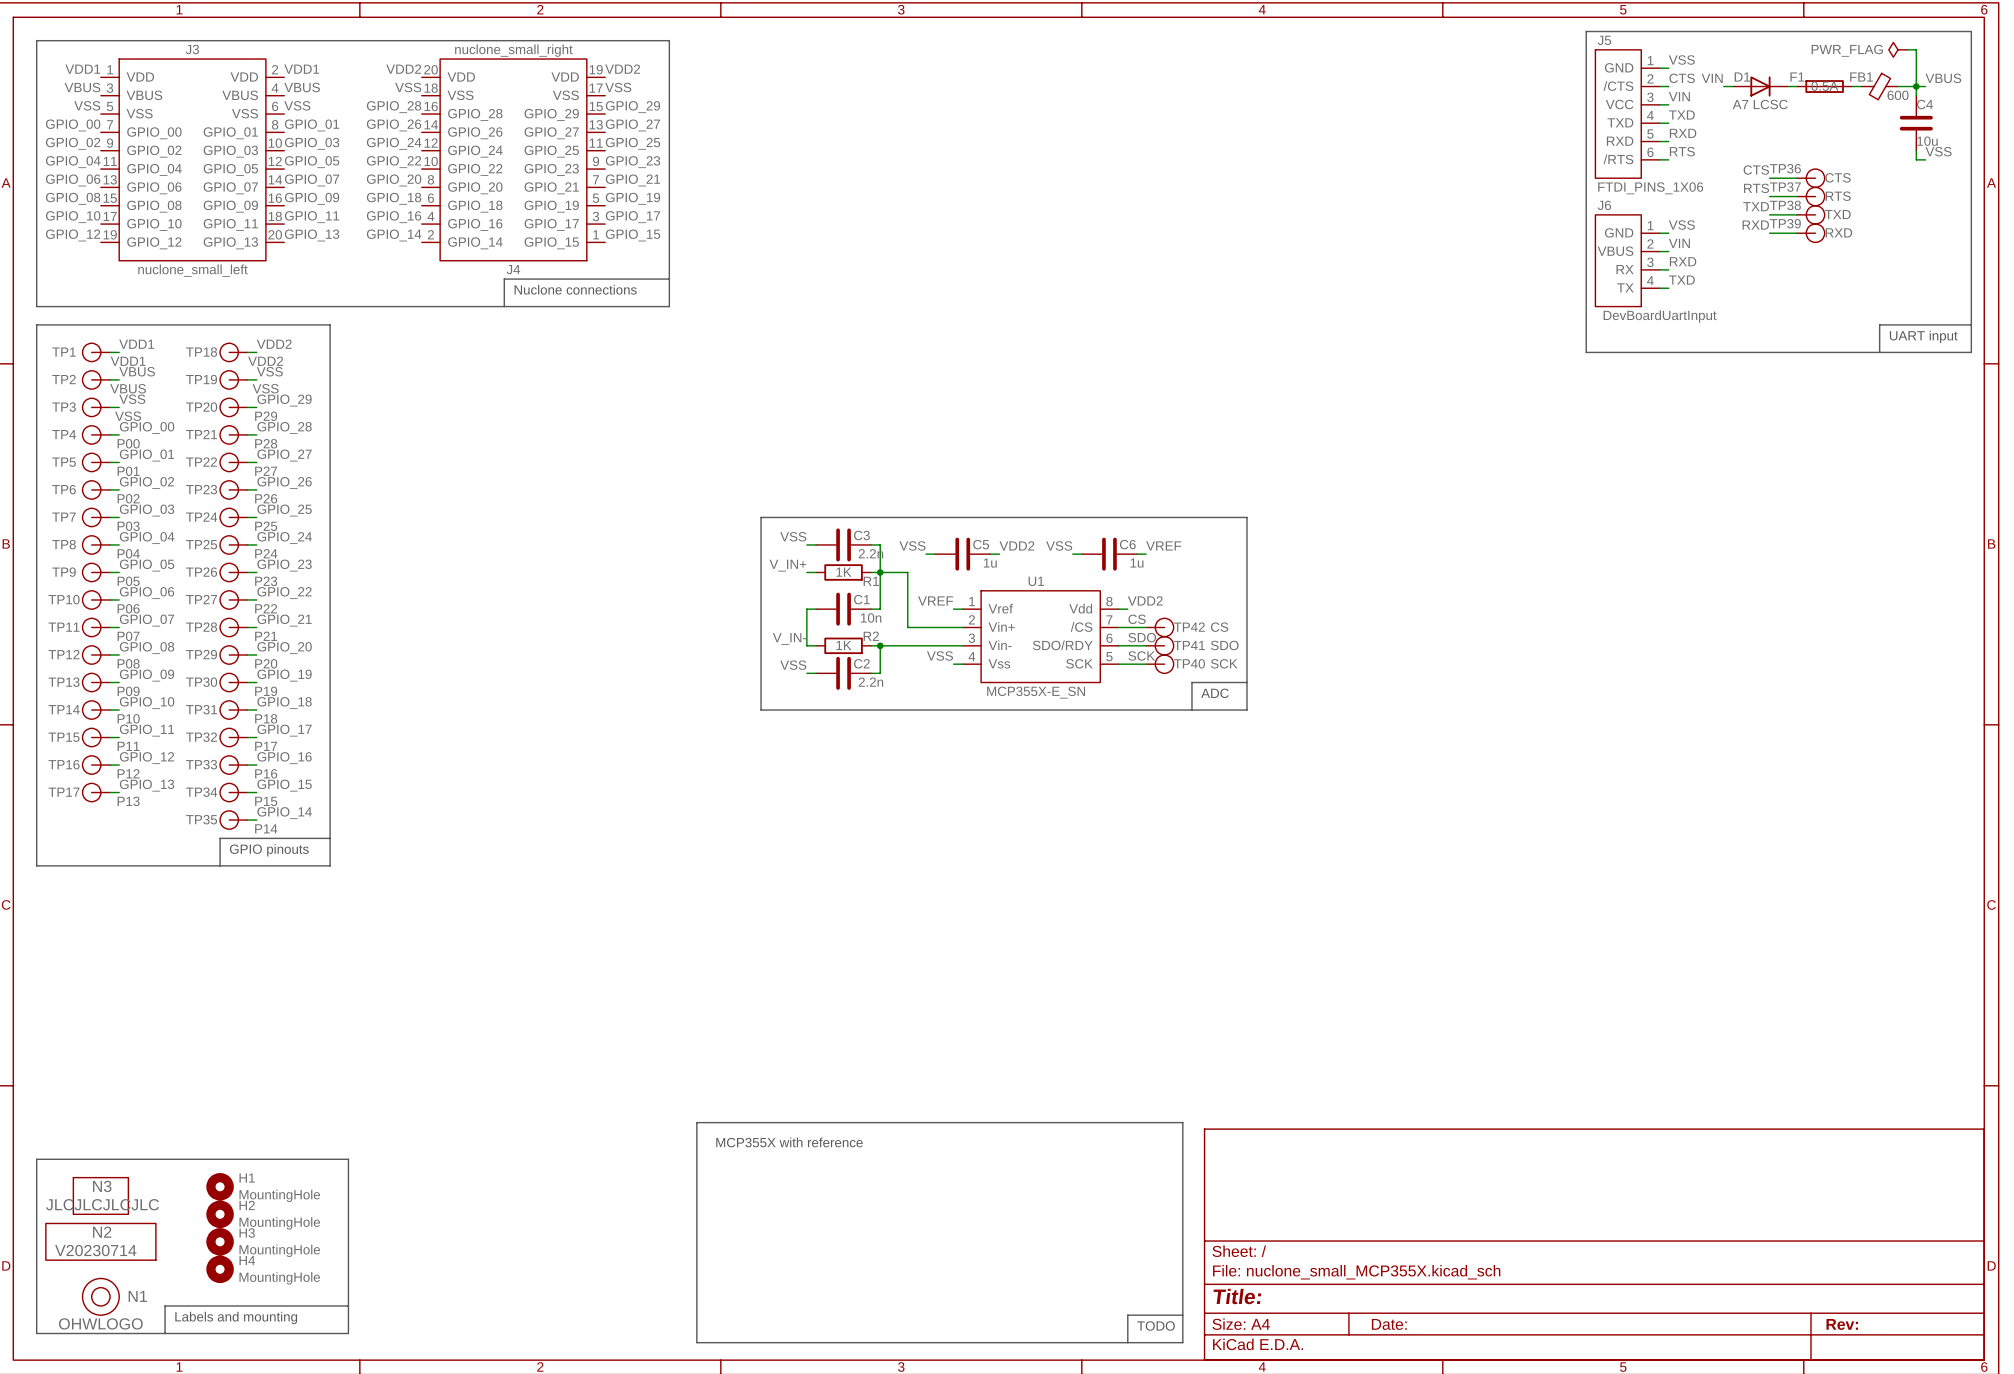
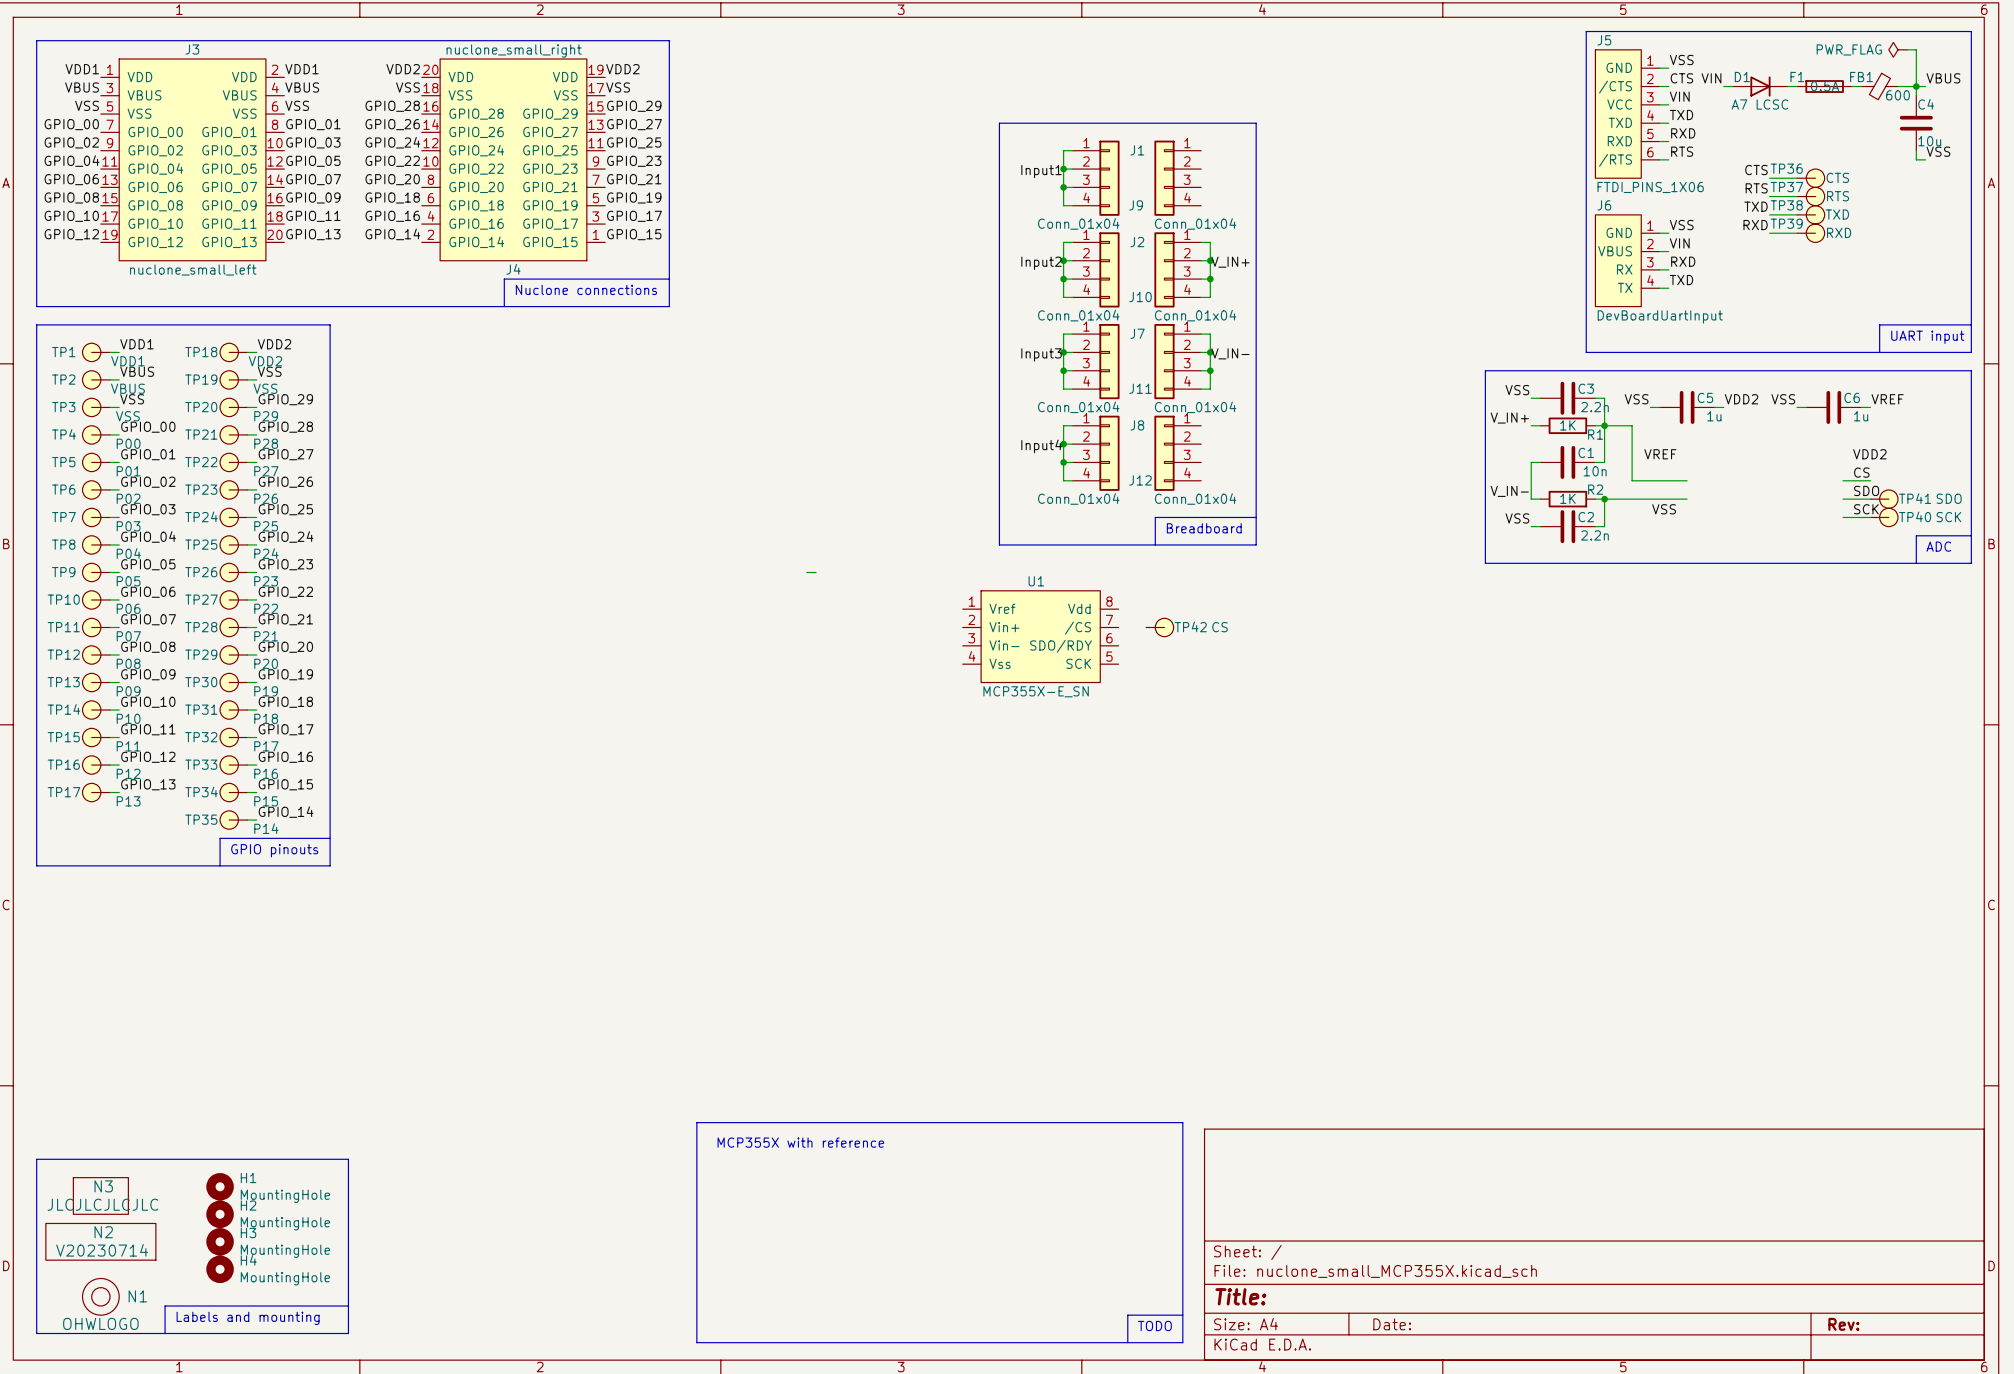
line: none -> (999, 123) (999, 544) (1256, 544) (1256, 123) (999, 123)
wire: none -> (1072, 150) (1063, 150) (1063, 205) (1072, 205)
wire: none -> (1063, 169) (1072, 169)
junction: none -> (1063, 169)
label: none -> Input1 (1041, 171)
J9: none -> Conn_01x04 (1096, 178)
J1: none -> Conn_01x04 (1177, 178)
wire: none -> (1063, 187) (1072, 187)
junction: none -> (1063, 187)
wire: none -> (1072, 242) (1063, 242) (1063, 297) (1072, 297)
wire: none -> (1201, 242) (1210, 242) (1210, 297) (1201, 297)
wire: none -> (1063, 260) (1072, 260)
junction: none -> (1063, 260)
wire: none -> (1201, 260) (1210, 260)
junction: none -> (1210, 260)
label: none -> Input2 (1041, 263)
label: none -> V_IN+ (1230, 262)
J10: none -> Conn_01x04 (1096, 269)
J2: none -> Conn_01x04 (1177, 269)
wire: none -> (1063, 279) (1072, 279)
junction: none -> (1063, 279)
wire: none -> (1201, 279) (1210, 279)
junction: none -> (1210, 279)
wire: none -> (1072, 334) (1063, 334) (1063, 389) (1072, 389)
wire: none -> (1201, 334) (1210, 334) (1210, 389) (1201, 389)
wire: none -> (1063, 352) (1072, 352)
junction: none -> (1063, 352)
wire: none -> (1201, 352) (1210, 352)
junction: none -> (1210, 352)
label: none -> Input3 (1041, 354)
label: none -> V_IN- (1230, 353)
J11: none -> Conn_01x04 (1096, 361)
J7: none -> Conn_01x04 (1177, 361)
wire: none -> (1063, 370) (1072, 370)
junction: none -> (1063, 370)
wire: none -> (1201, 370) (1210, 370)
junction: none -> (1210, 370)
line: none -> (1485, 370) (1971, 370) (1971, 563) (1485, 563) (1485, 370)
label: none -> VSS (1517, 390)
wire: none -> (1531, 398) (1540, 398)
wire: none -> (1595, 398) (1604, 398) (1604, 462) (1595, 462)
label: none -> VSS (1636, 399)
label: none -> VDD2 (1741, 399)
label: none -> VSS (1783, 399)
label: none -> VREF (1887, 399)
wire: none -> (1650, 407) (1659, 407)
wire: none -> (1714, 407) (1723, 407)
wire: none -> (1797, 407) (1806, 407)
wire: none -> (1861, 407) (1870, 407)
label: none -> V_IN+ (1509, 418)
wire: none -> (1072, 425) (1063, 425) (1063, 480) (1072, 480)
wire: none -> (1531, 425) (1540, 425)
wire: none -> (1595, 425) (1632, 425) (1632, 480) (1687, 480)
junction: none -> (1604, 425)
junction: none -> (1063, 444)
label: none -> Input4 (1041, 446)
J12: none -> Conn_01x04 (1096, 453)
J8: none -> Conn_01x04 (1177, 453)
label: none -> VREF (1660, 454)
label: none -> VDD2 (1869, 454)
junction: none -> (1063, 462)
wire: none -> (1540, 462) (1531, 462) (1531, 499) (1540, 499)
label: none -> CS (1861, 472)
wire: none -> (1842, 480) (1870, 480)
label: none -> SDO (1866, 490)
label: none -> V_IN- (1509, 491)
wire: none -> (1595, 499) (1687, 499)
wire: none -> (1604, 499) (1604, 526) (1595, 526)
junction: none -> (1604, 499)
wire: none -> (1842, 499) (1870, 499)
label: none -> VSS (1664, 509)
label: none -> SCK (1866, 509)
line: (1155, 517) (761, 517) (761, 710) (1246, 710) (1246, 517) -> (1155, 517) (1155, 544)
line: none -> (1246, 517) (1256, 517)
wire: none -> (1842, 517) (1870, 517)
label: none -> VSS (1517, 518)
wire: none -> (1531, 526) (1540, 526)
text: none -> Breadboard (1204, 528)
line: none -> (1971, 535) (1916, 535) (1916, 563)
label: VSS (793, 536) -> none
wire: (806, 544) (816, 544) -> none
C3 position: (843, 544) -> (1567, 398)
wire: (871, 544) (880, 544) (880, 609) (871, 609) -> none
label: VSS (912, 545) -> none
label: VDD2 (1016, 545) -> none
label: VSS (1059, 545) -> none
label: VREF (1163, 545) -> none
text: none -> ADC (1938, 546)
wire: (926, 554) (935, 554) -> none
C5 position: (962, 554) -> (1687, 407)
wire: (990, 554) (999, 554) -> (1063, 444) (1072, 444)
wire: (1072, 554) (1081, 554) -> (1063, 462) (1072, 462)
C6 position: (1109, 554) -> (1833, 407)
wire: (1136, 554) (1146, 554) -> none
label: V_IN+ (787, 565) -> none
R1 position: (843, 572) -> (1567, 425)
wire: (871, 572) (907, 572) (907, 627) (962, 627) -> none
junction: (880, 572) -> none
label: VREF (935, 600) -> none
label: VDD2 (1145, 600) -> none
wire: (816, 609) (806, 609) (806, 645) (816, 645) -> none
C1 position: (843, 609) -> (1567, 462)
wire: (953, 609) (962, 609) -> none
wire: (1118, 609) (1127, 609) -> none
label: CS (1137, 619) -> none
wire: (1118, 627) (1146, 627) -> none
label: SDO (1142, 637) -> none
label: V_IN- (789, 638) -> none
R2 position: (843, 645) -> (1567, 499)
wire: (871, 645) (962, 645) -> none
wire: (880, 645) (880, 673) (871, 673) -> none
junction: (880, 645) -> none
wire: (1118, 645) (1146, 645) -> none
TP41 position: (1159, 645) -> (1884, 499)
label: VSS (939, 655) -> none
label: SCK (1141, 655) -> none
wire: (953, 664) (962, 664) -> none
wire: (1118, 664) (1146, 664) -> none
TP40 position: (1159, 664) -> (1884, 517)
label: VSS (793, 665) -> none
wire: (806, 673) (816, 673) -> none
C2 position: (843, 673) -> (1567, 526)
line: (1246, 682) (1191, 682) (1191, 710) -> none
text: ADC (1214, 693) -> none

